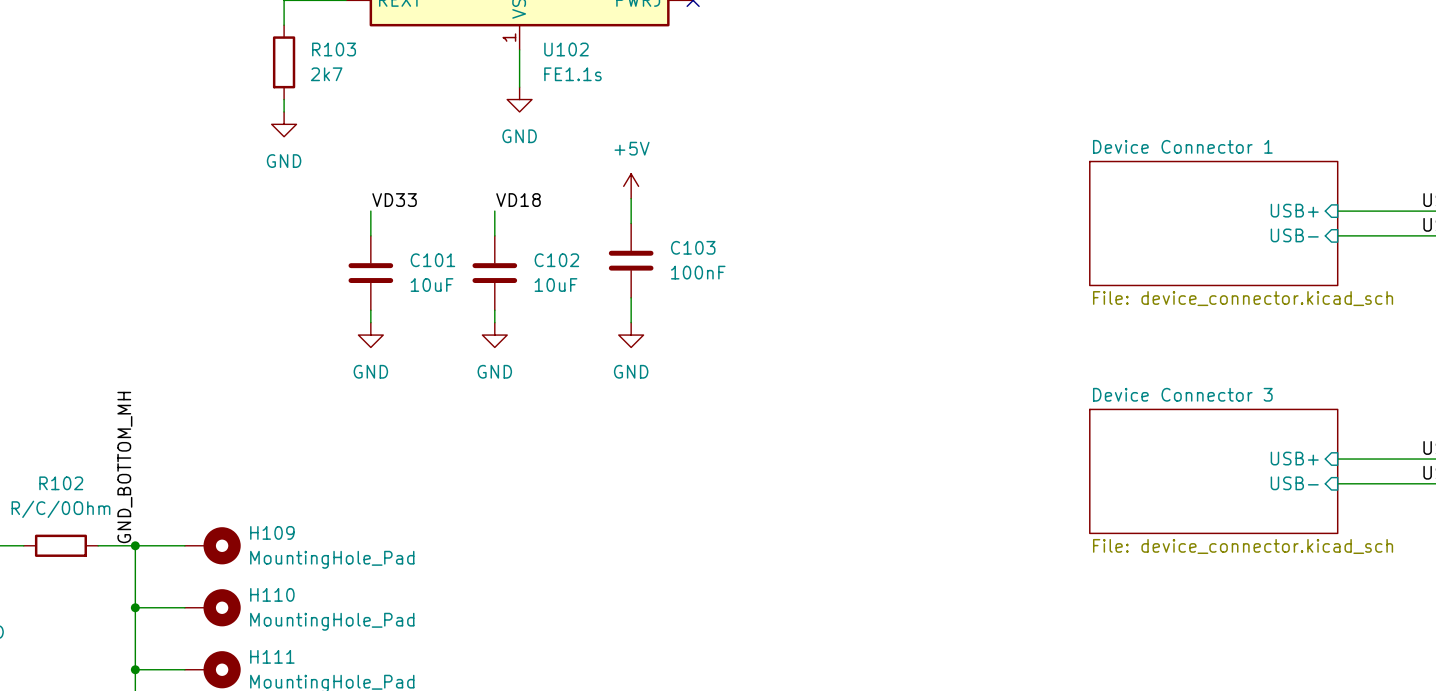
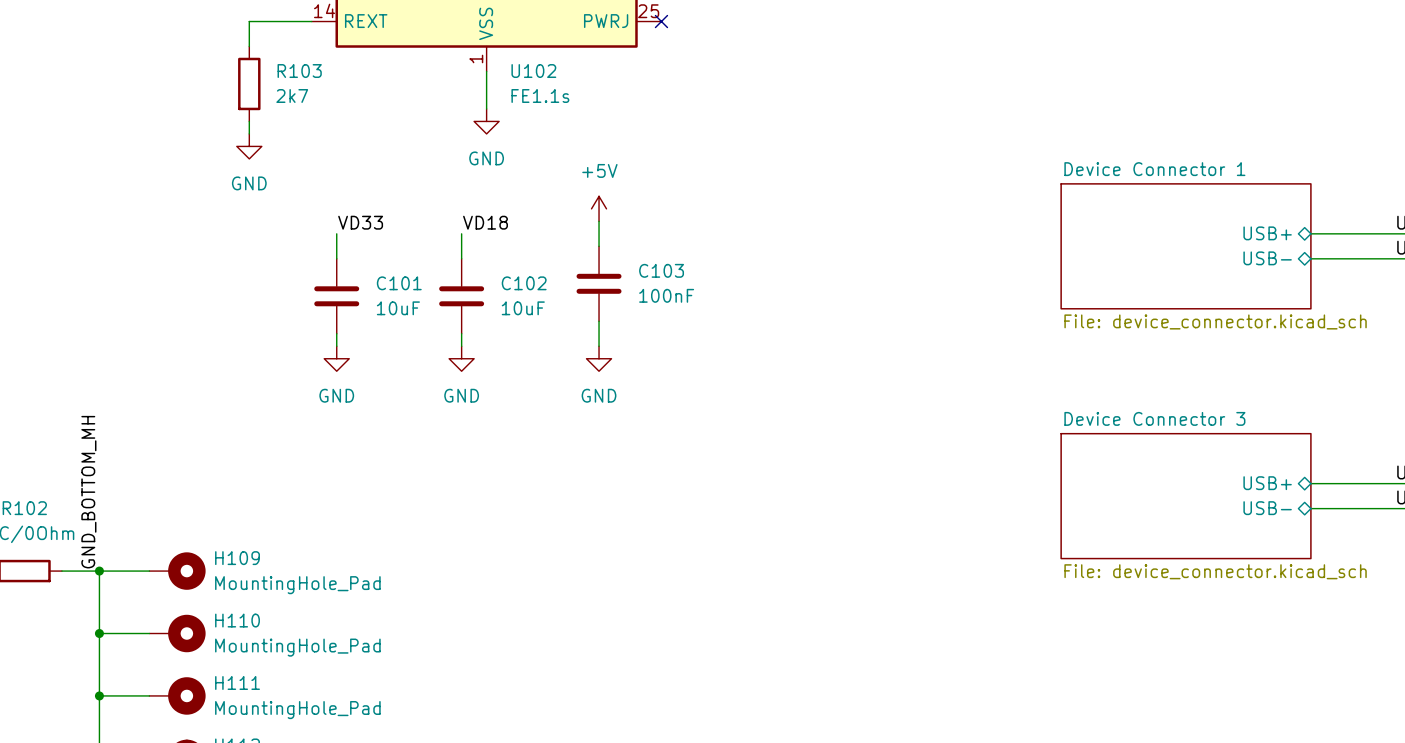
sheet pin shape: input (1294, 210) -> bidirectional (1267, 233)
sheet pin shape: input (1294, 235) -> bidirectional (1267, 258)
sheet pin shape: input (1294, 458) -> bidirectional (1267, 483)
sheet pin shape: input (1294, 483) -> bidirectional (1267, 508)

